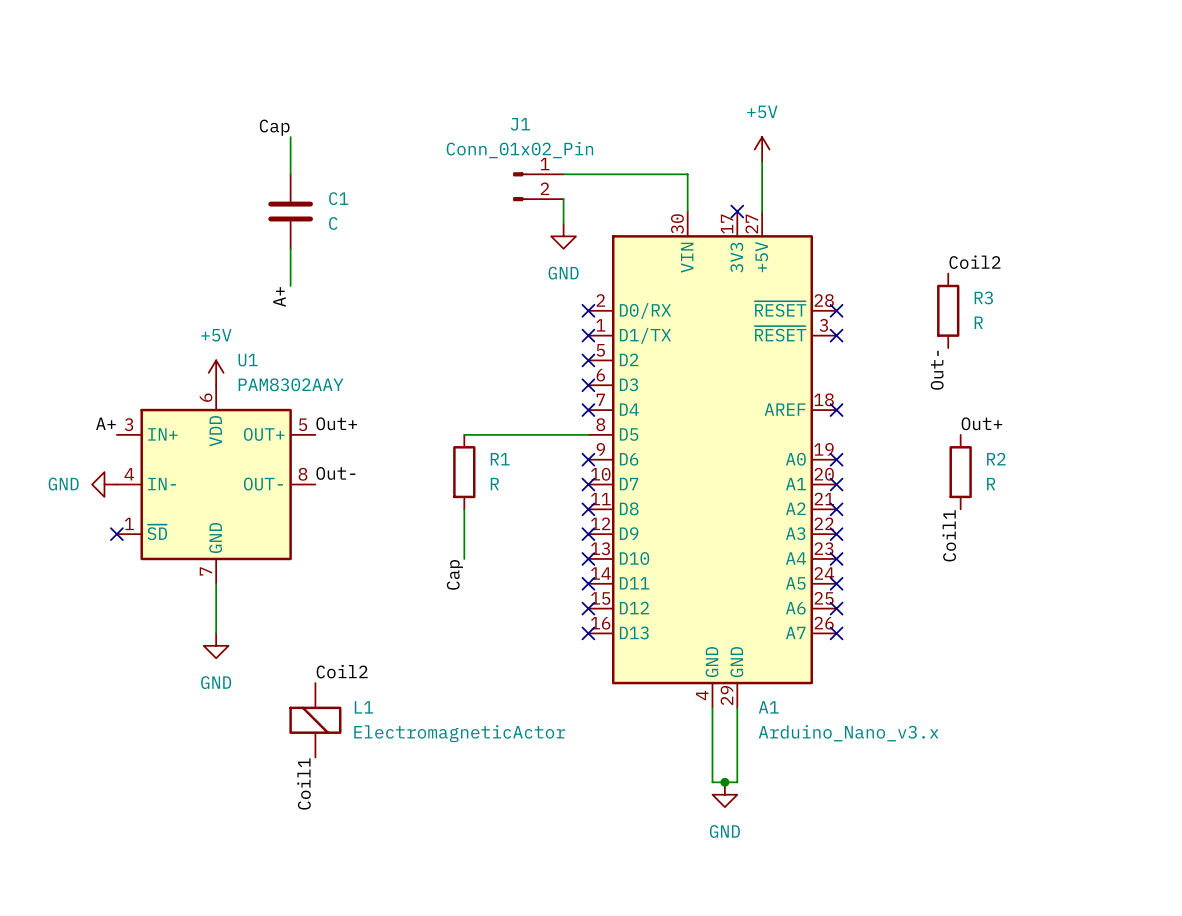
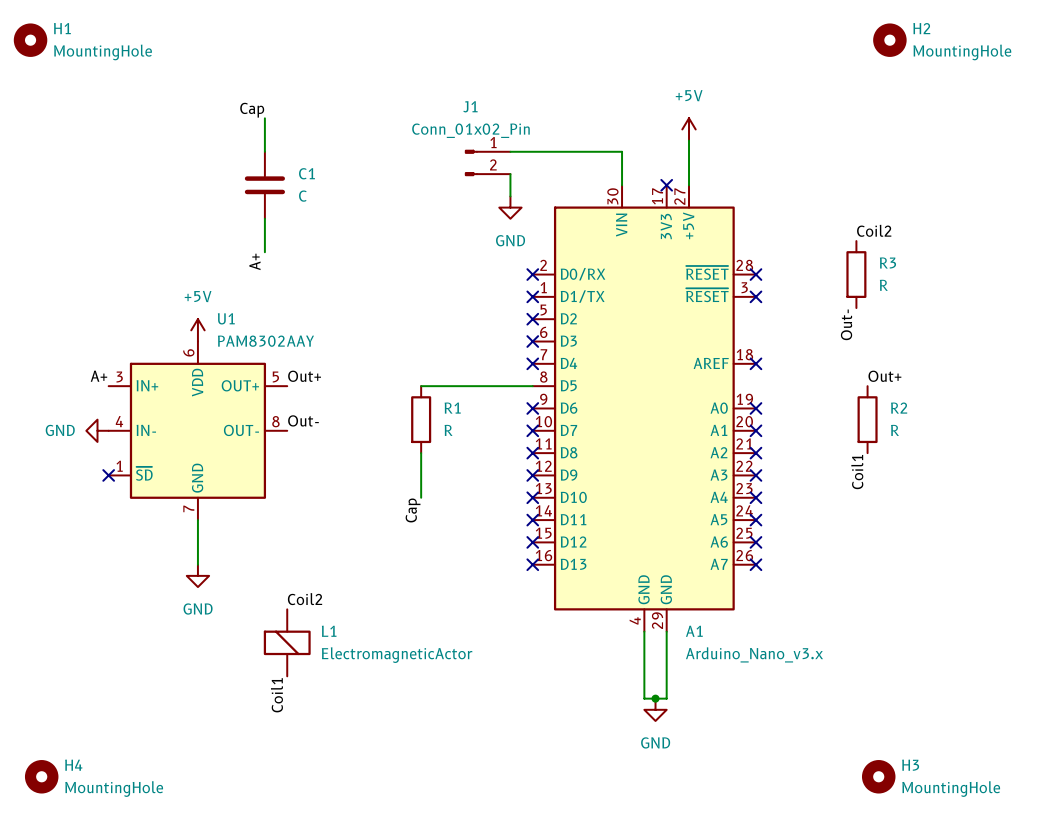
H1: none -> MountingHole (30, 40)
H2: none -> MountingHole (889, 40)
H4: none -> MountingHole (41, 776)
H3: none -> MountingHole (878, 776)

